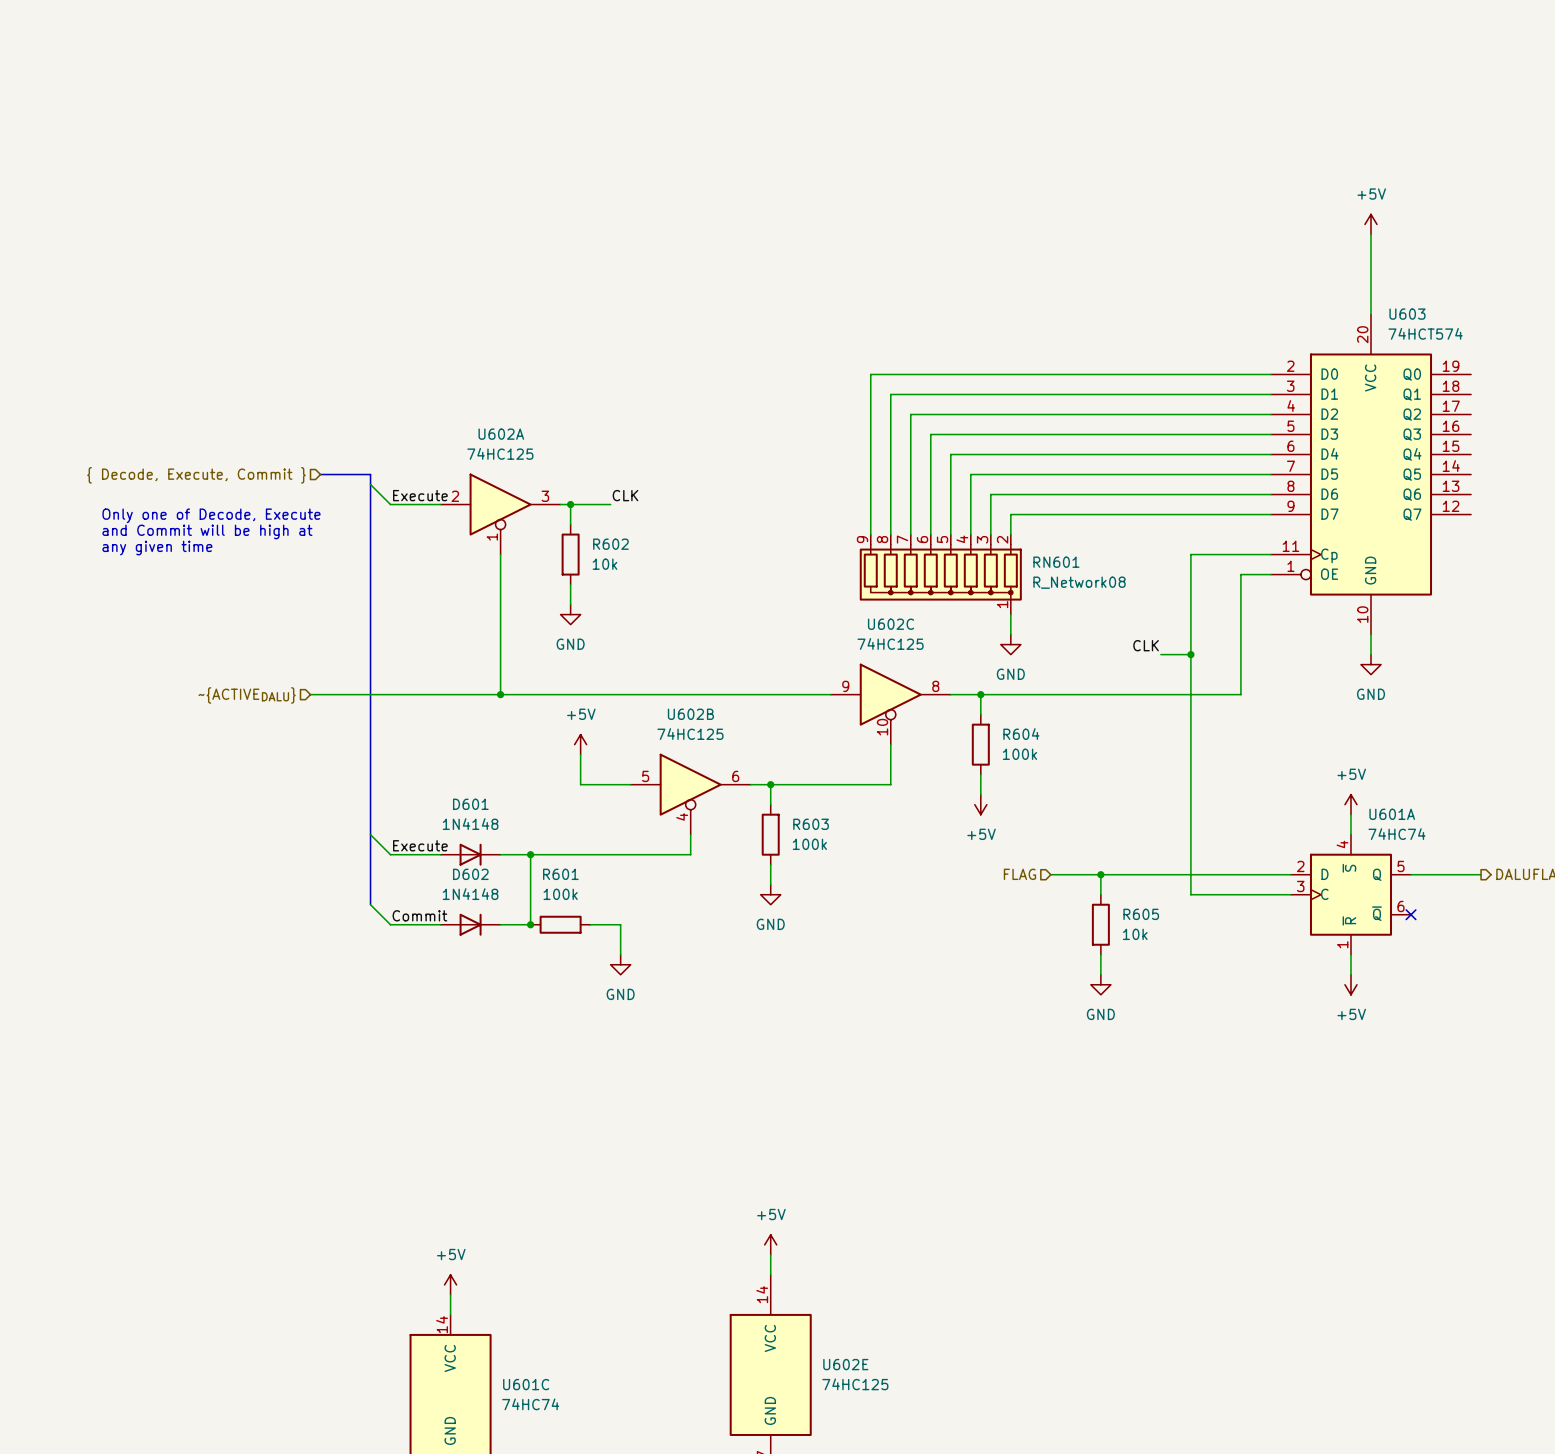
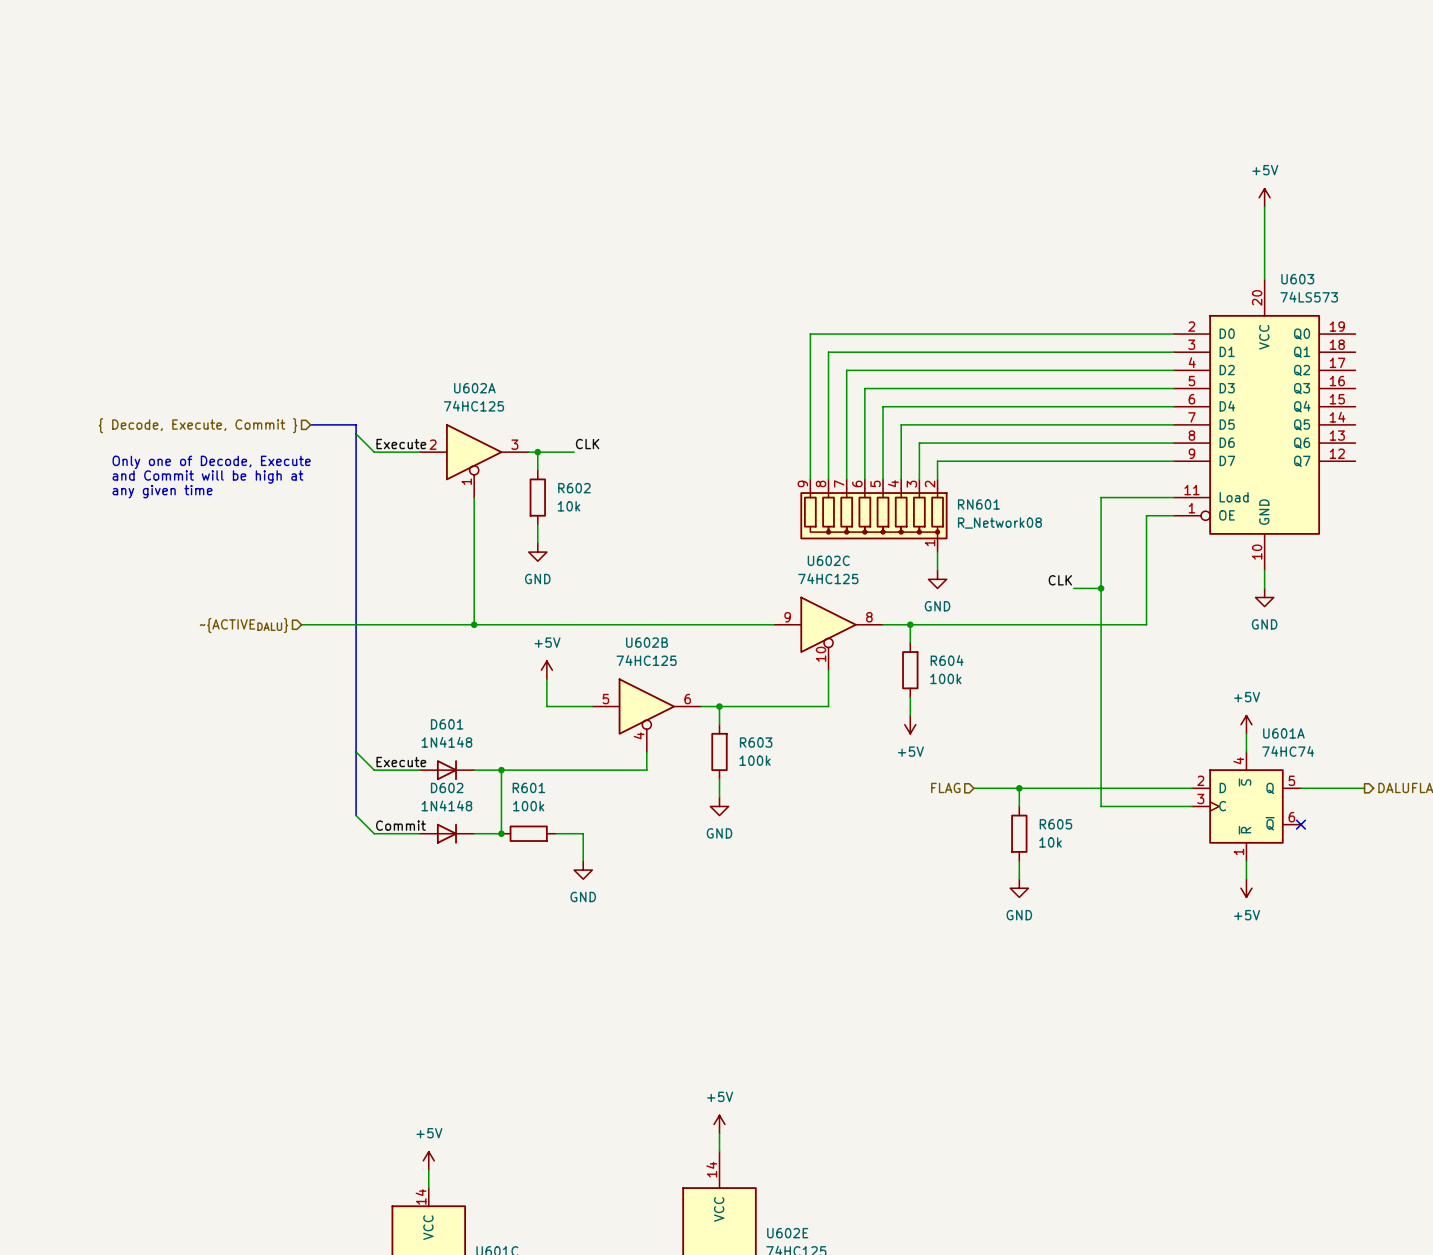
U603 symbol: [1270, 314, 1472, 635] -> [1173, 279, 1356, 571]
U603 value: 74HCT574 (1425, 333) -> 74LS573 (1309, 297)

